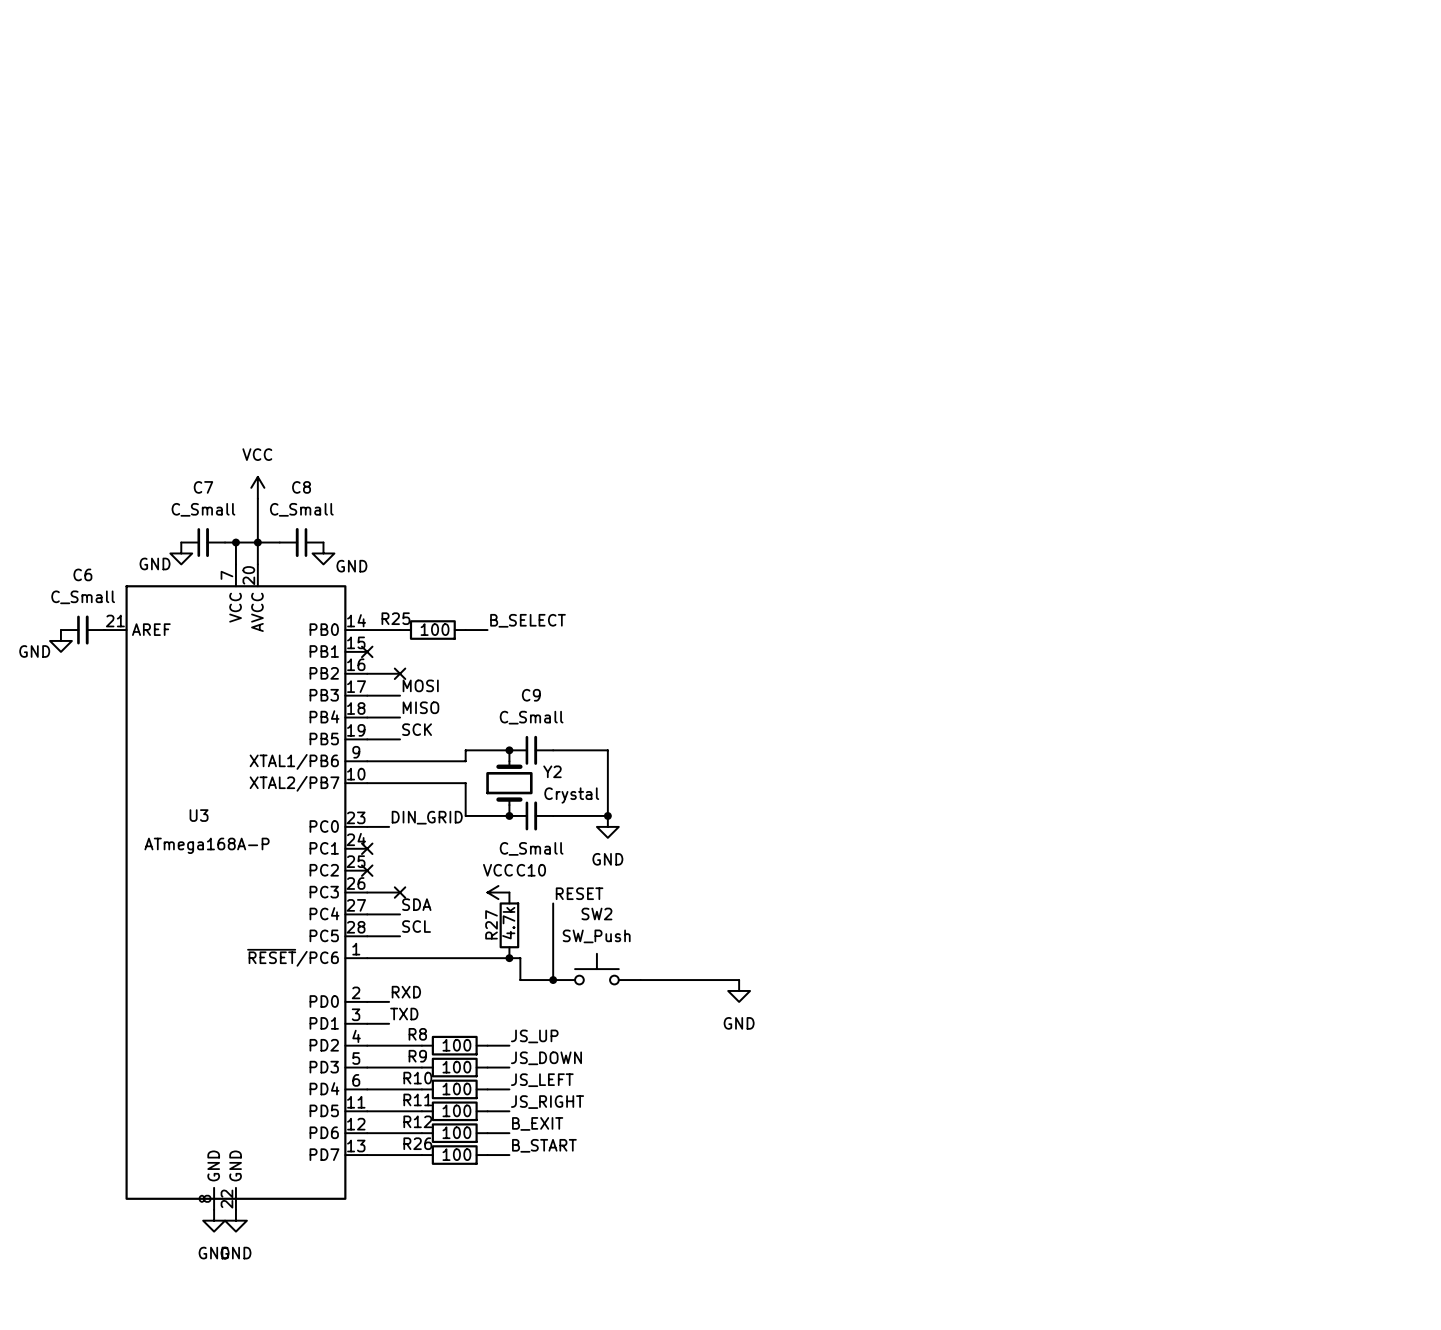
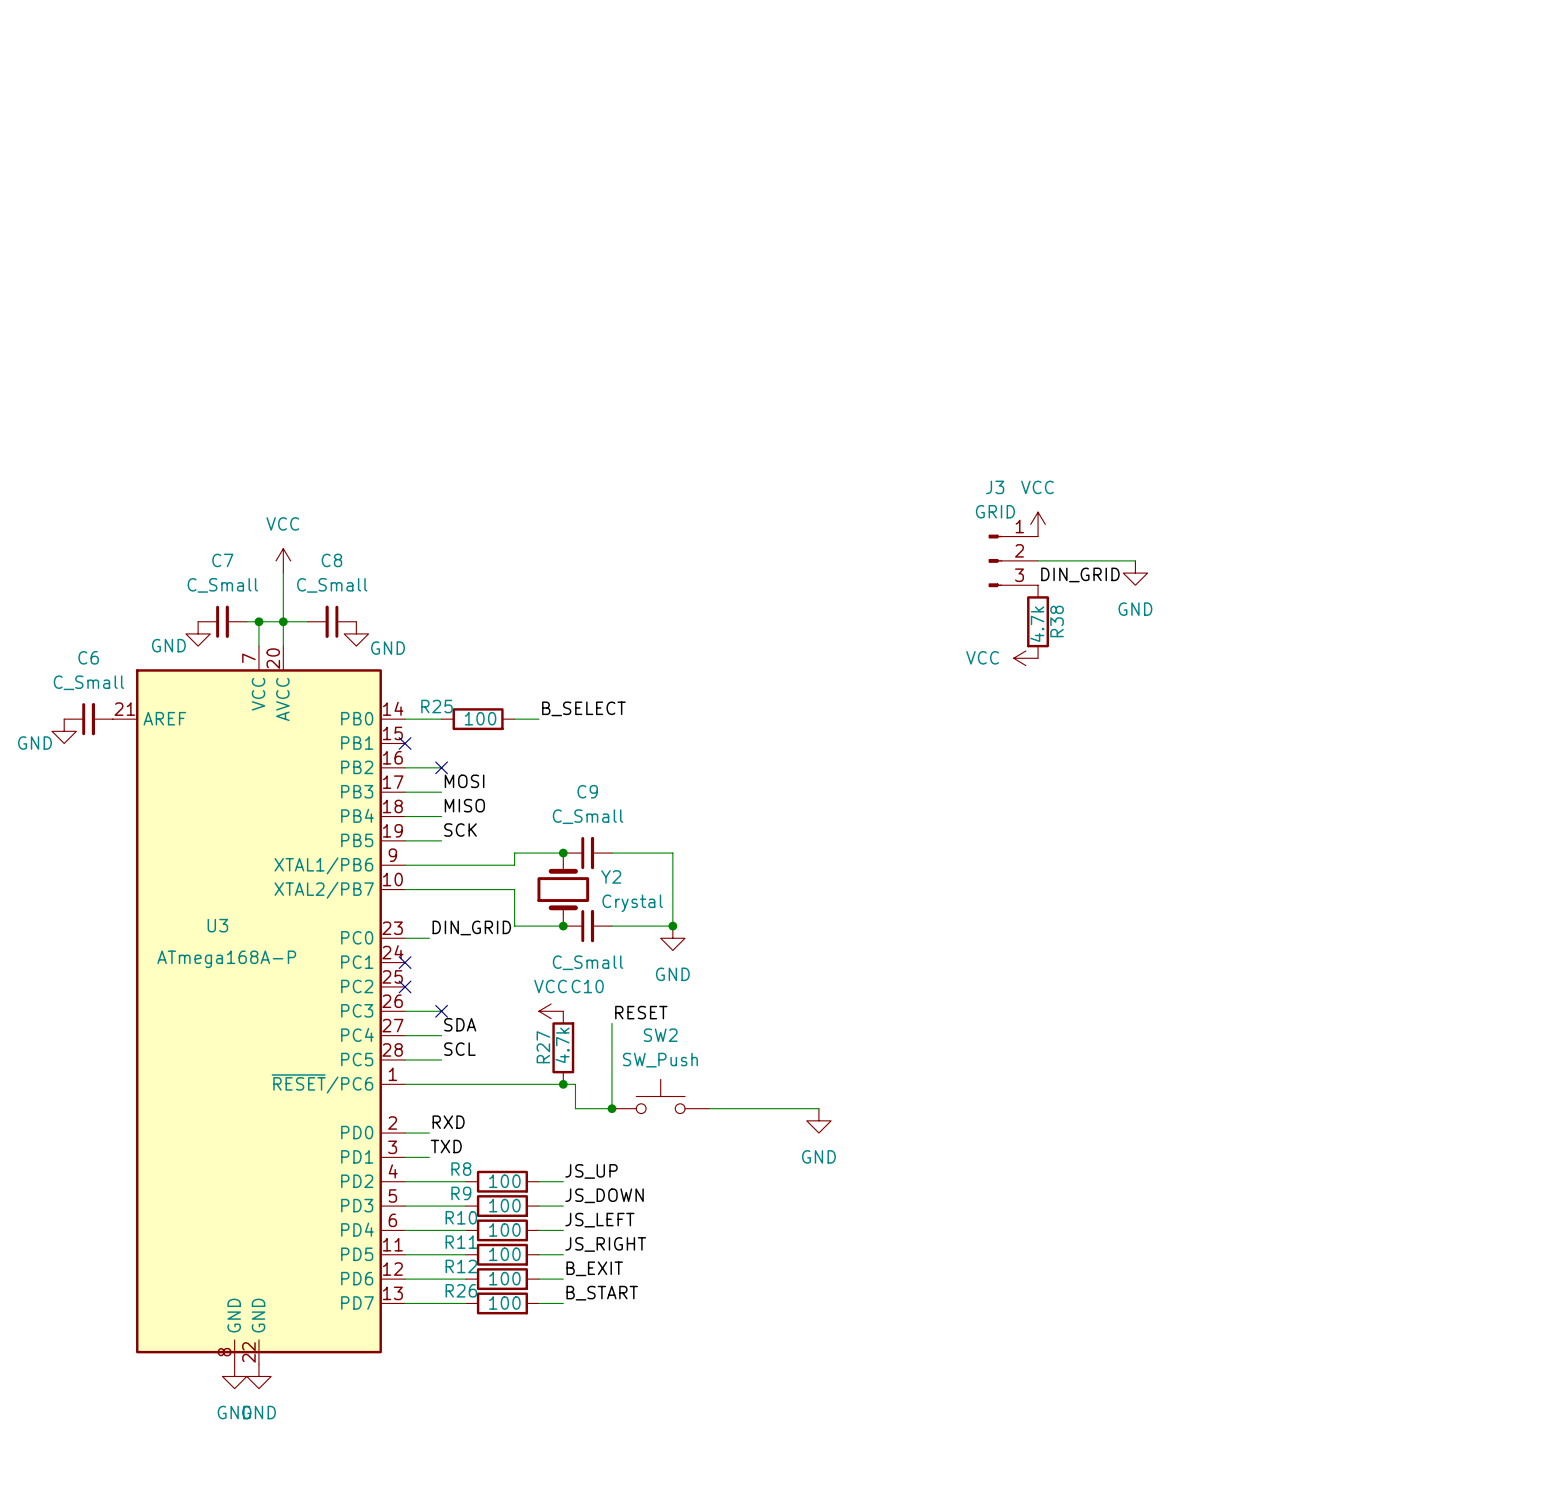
power symbol: none -> VCC (1038, 524)
J3: none -> GRID (1013, 560)
wire: none -> (1038, 560) (1135, 560)
power symbol: none -> GND (1135, 573)
label: none -> DIN_GRID (1080, 574)
R38: none -> 4.7k (1038, 621)
power symbol: none -> VCC (1025, 658)

